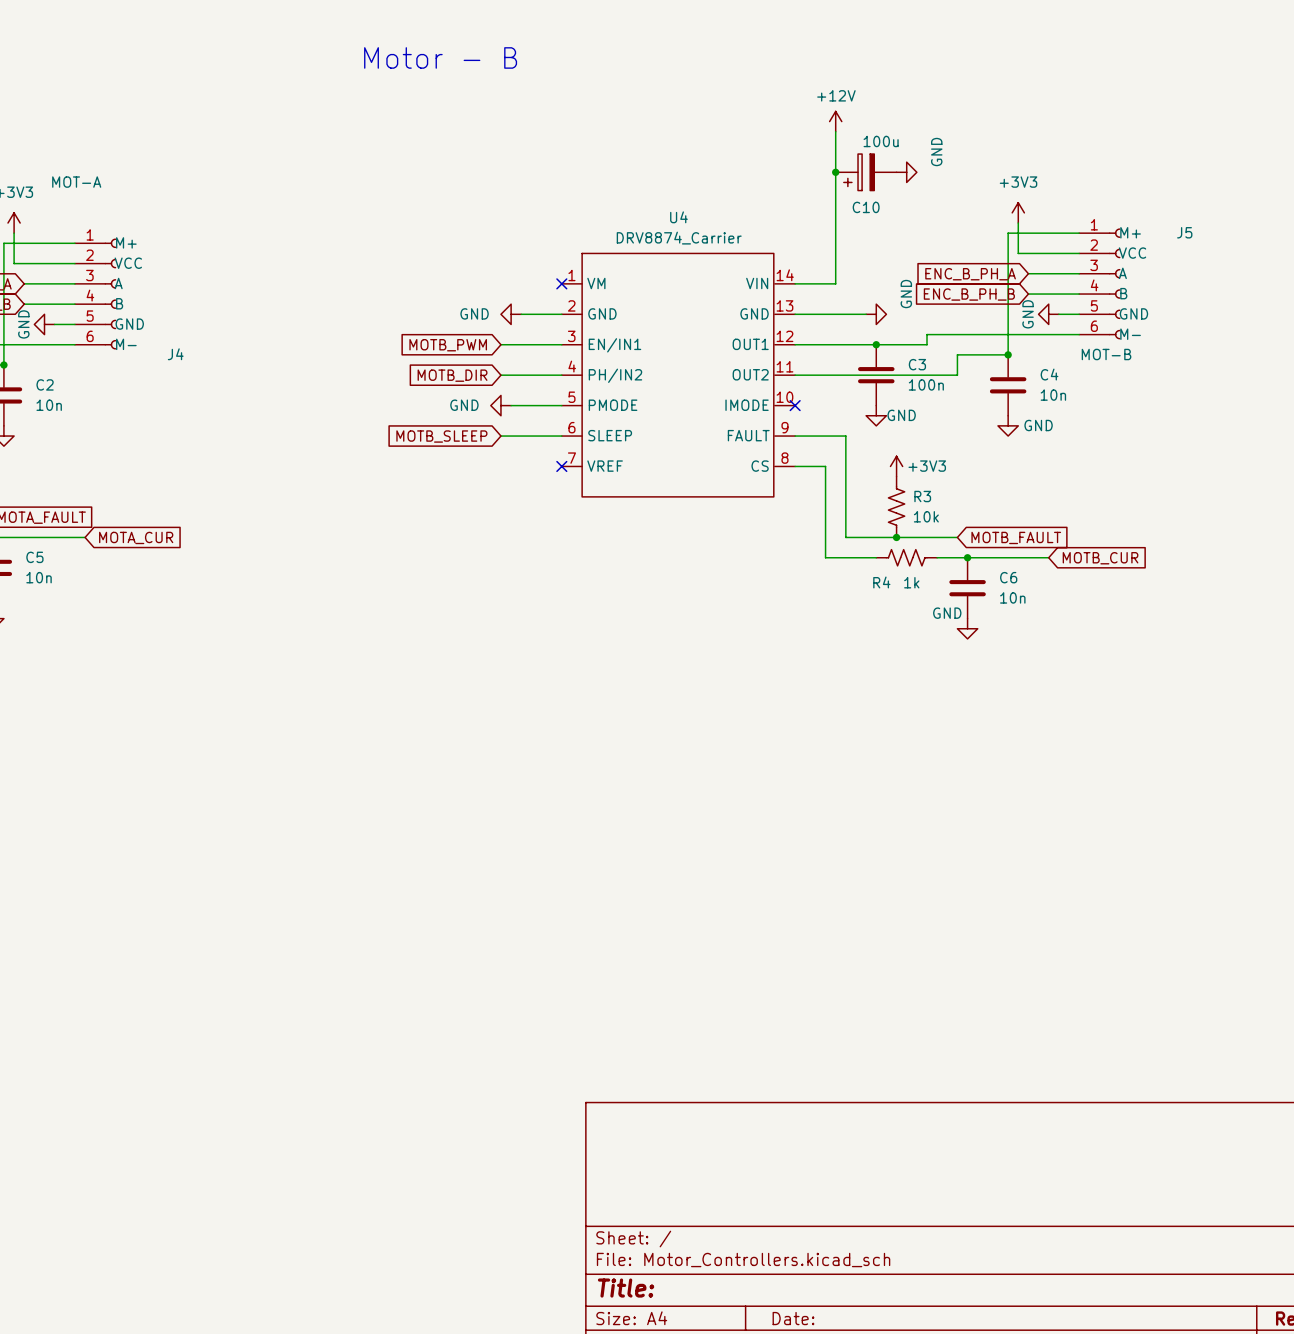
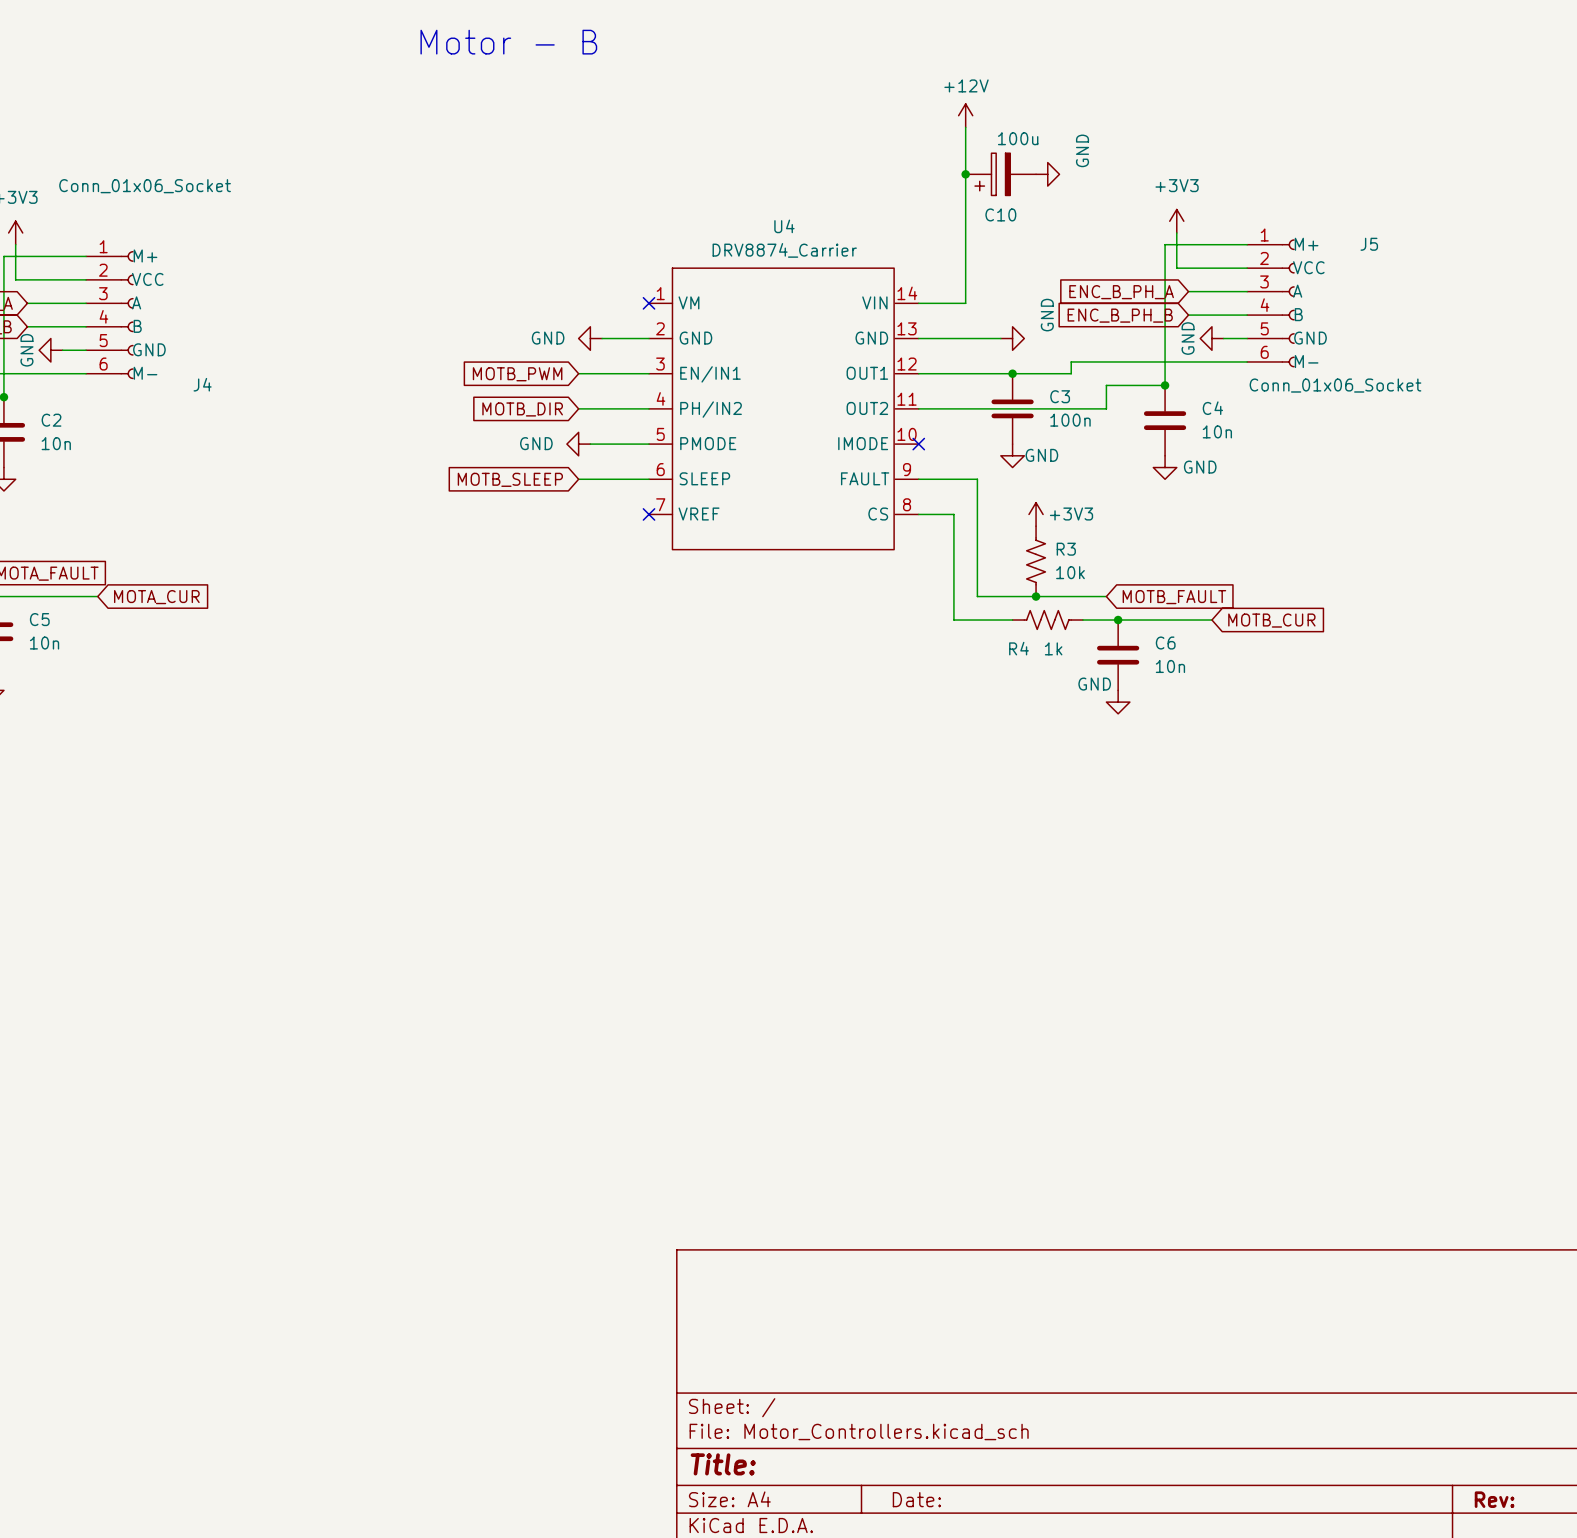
J4 value: MOT-A (76, 182) -> Conn_01x06_Socket (145, 186)
J5 value: MOT-B (1106, 354) -> Conn_01x06_Socket (1335, 385)

